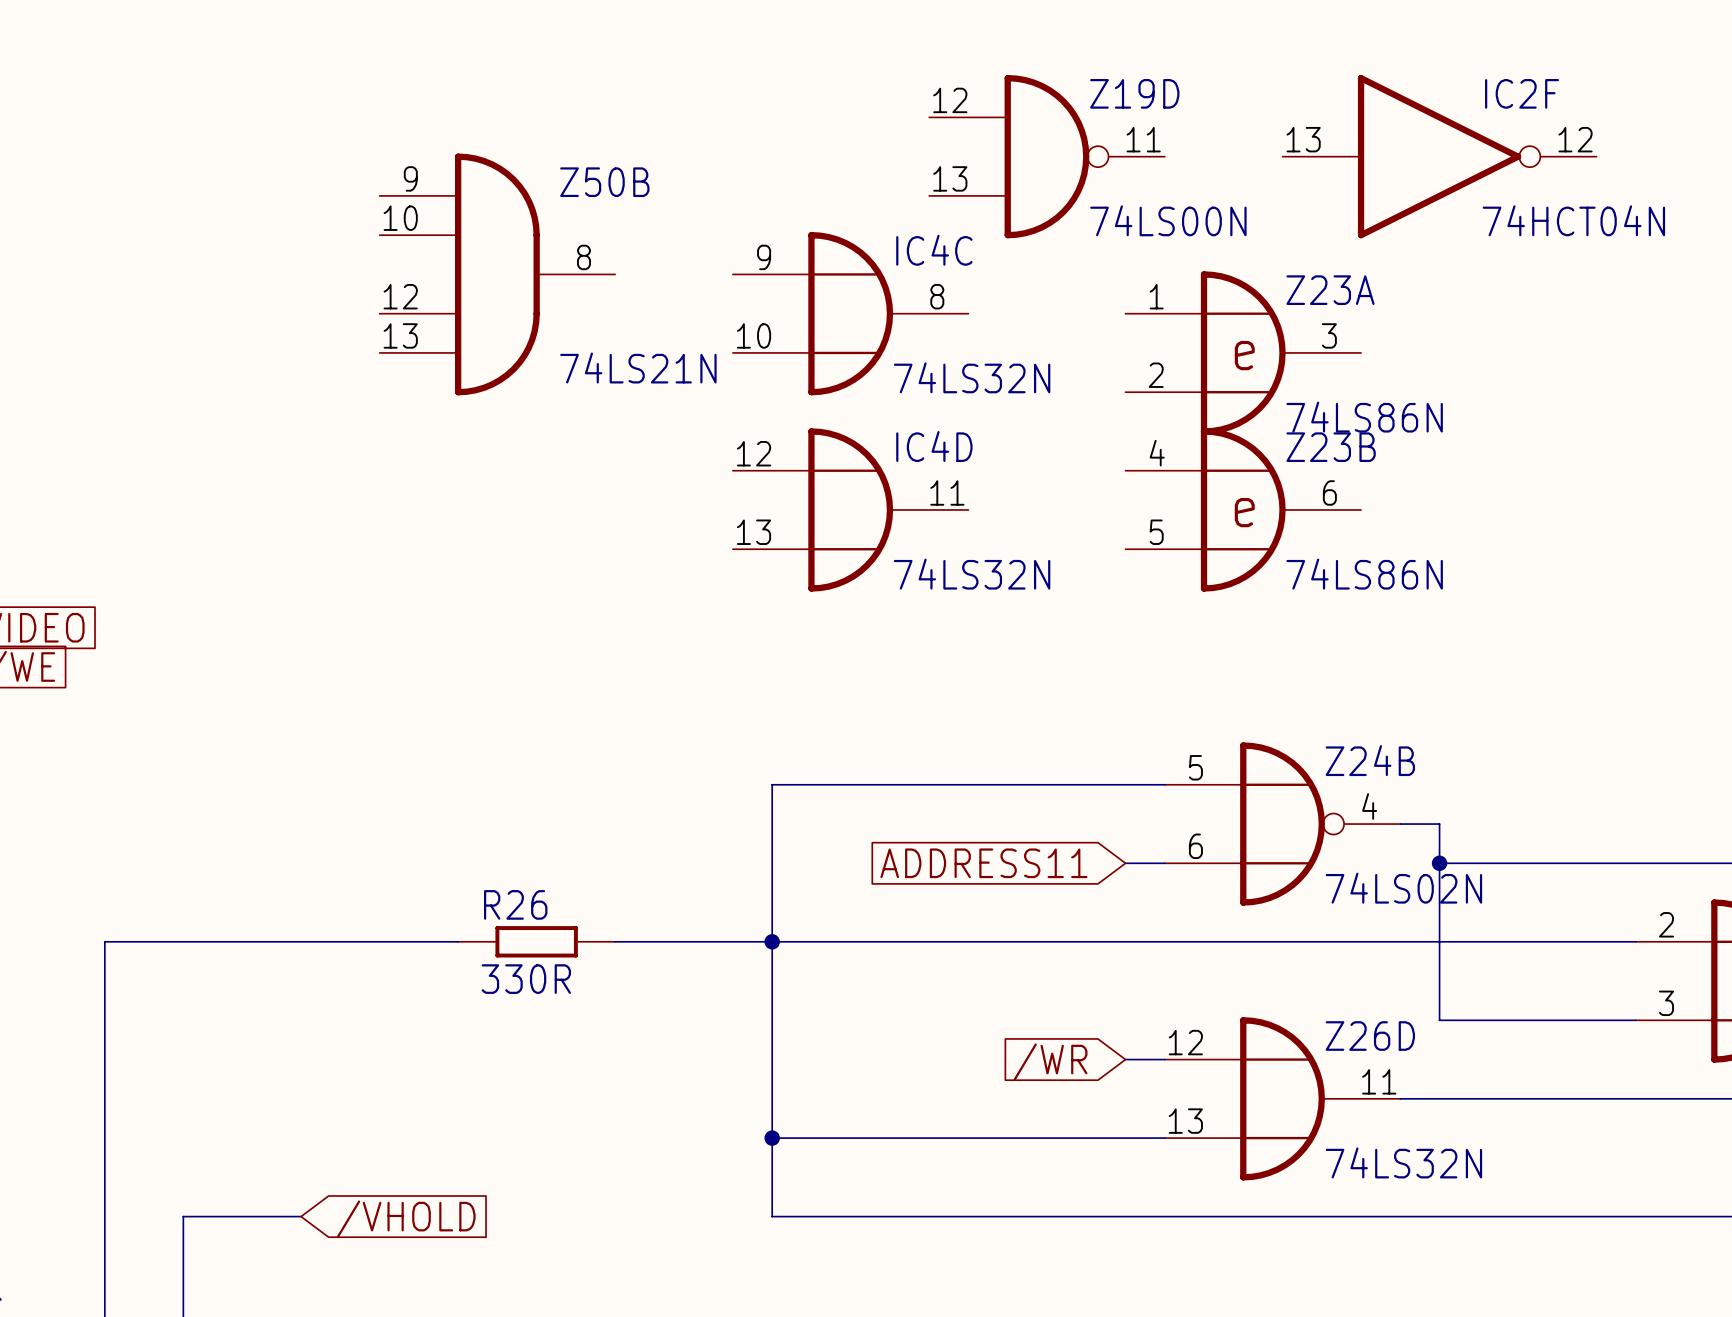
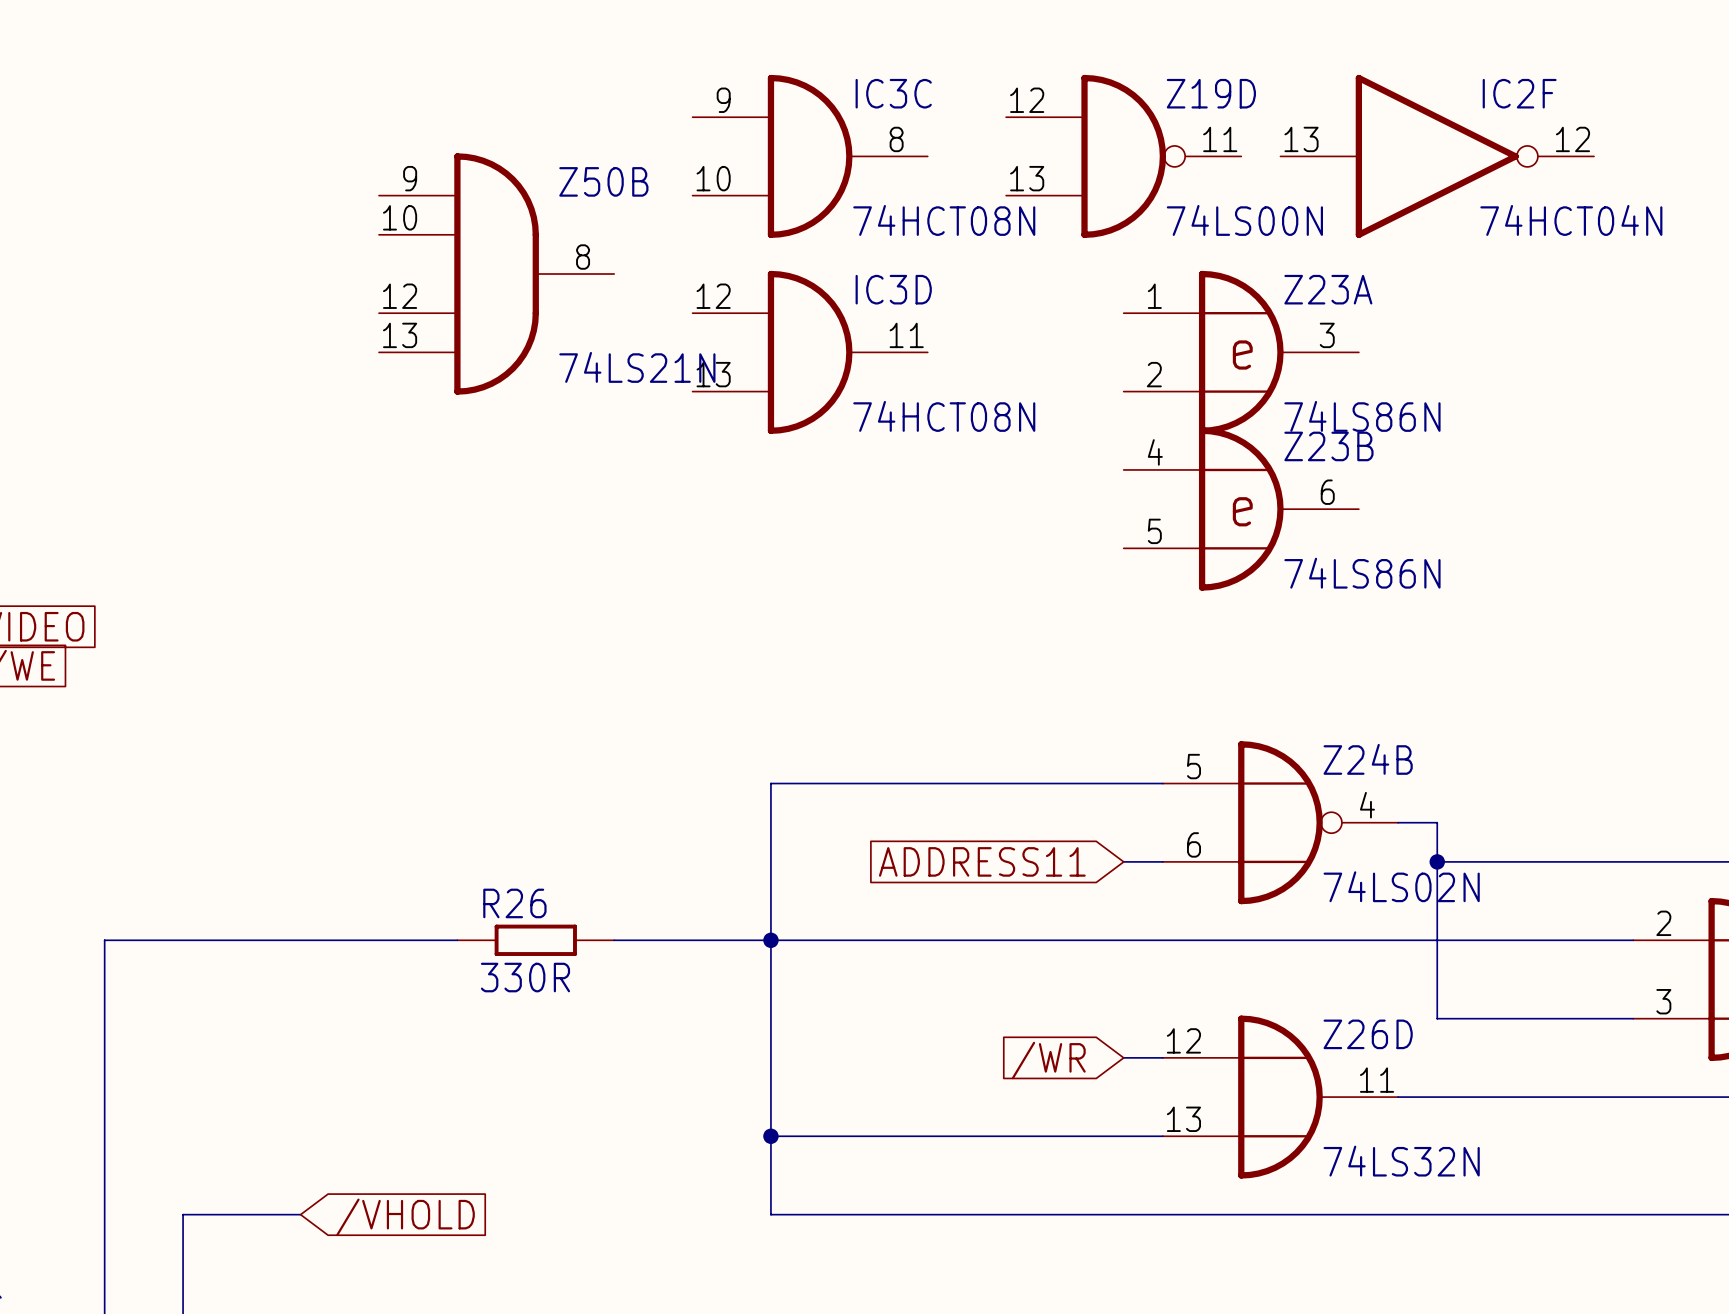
IC3C: none -> 74HCT08N (810, 156)
Z19D position: (1046, 156) -> (1123, 156)
IC4C: 74LS32N (850, 313) -> none
IC3D: none -> 74HCT08N (810, 352)
IC4D: 74LS32N (850, 509) -> none

